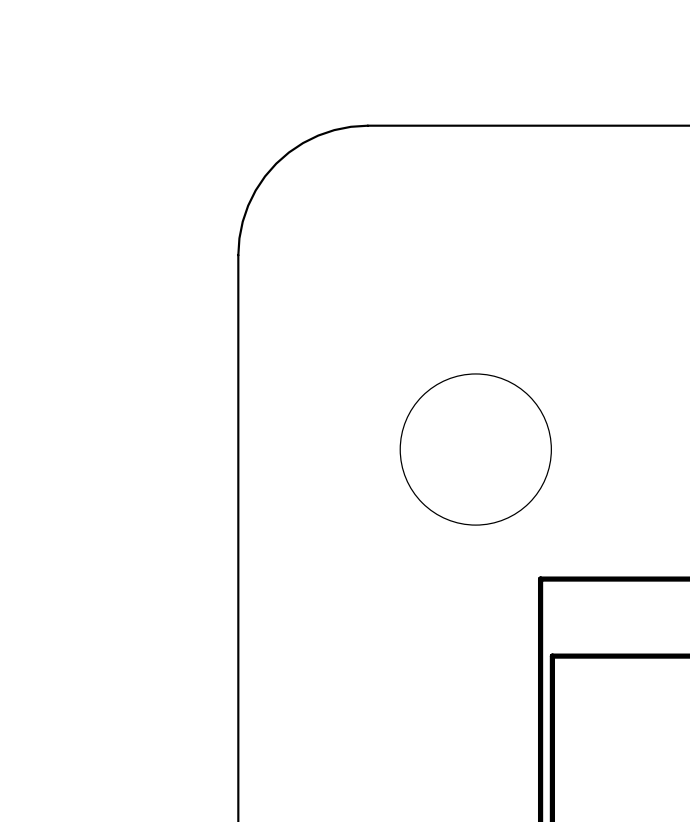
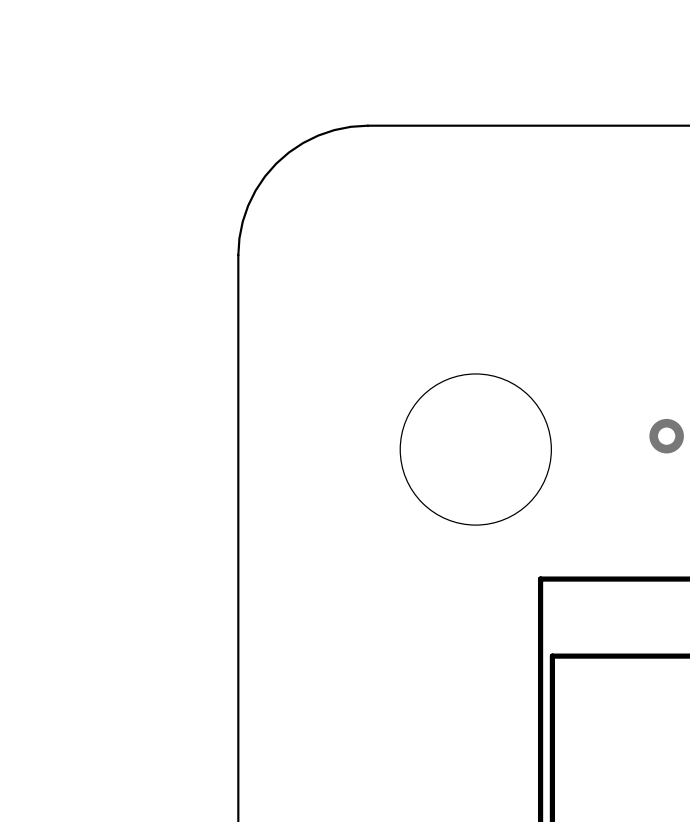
via: none -> (666, 436)

